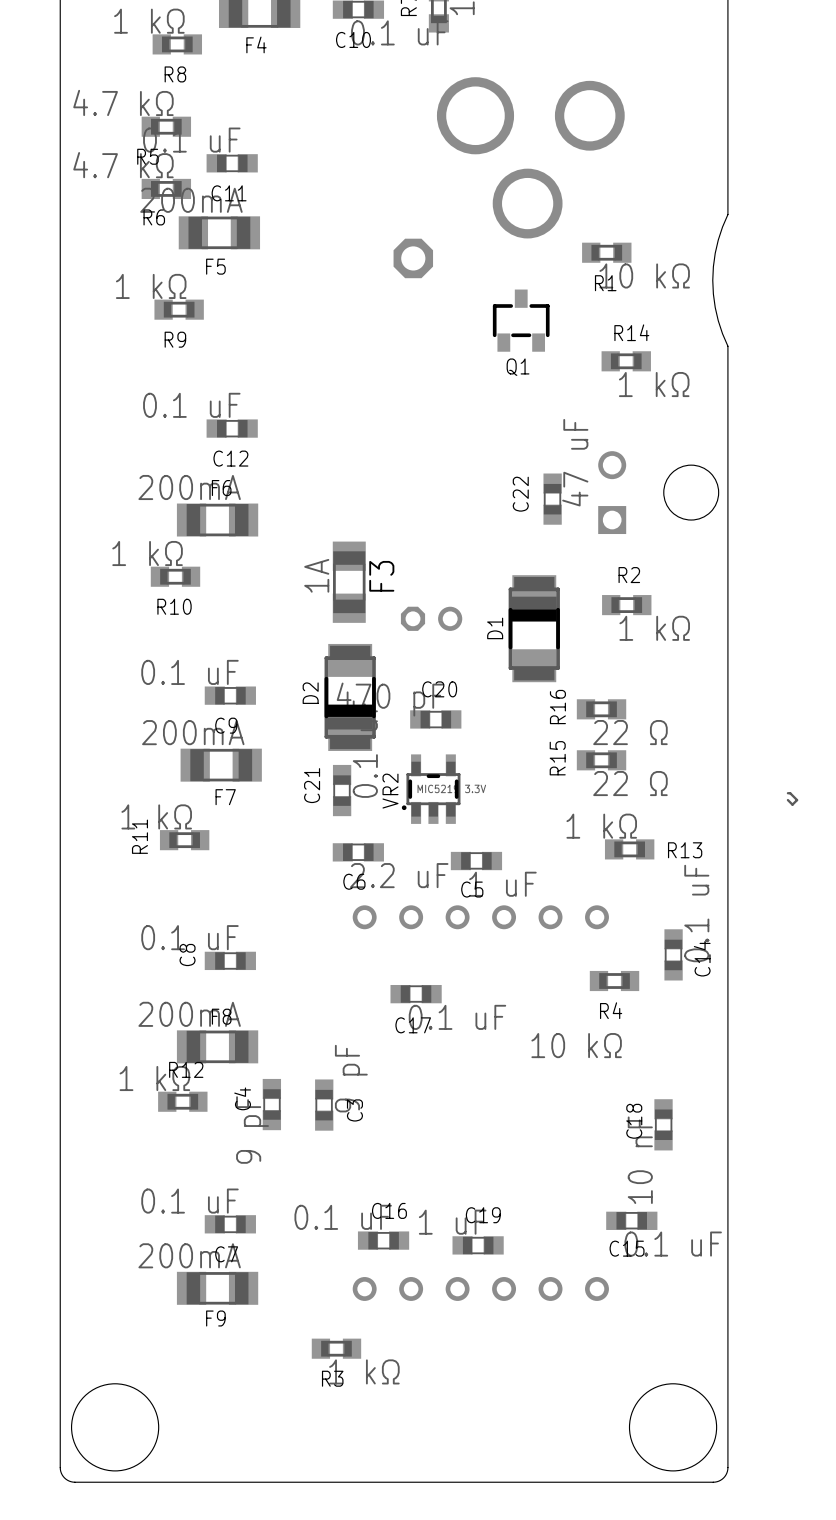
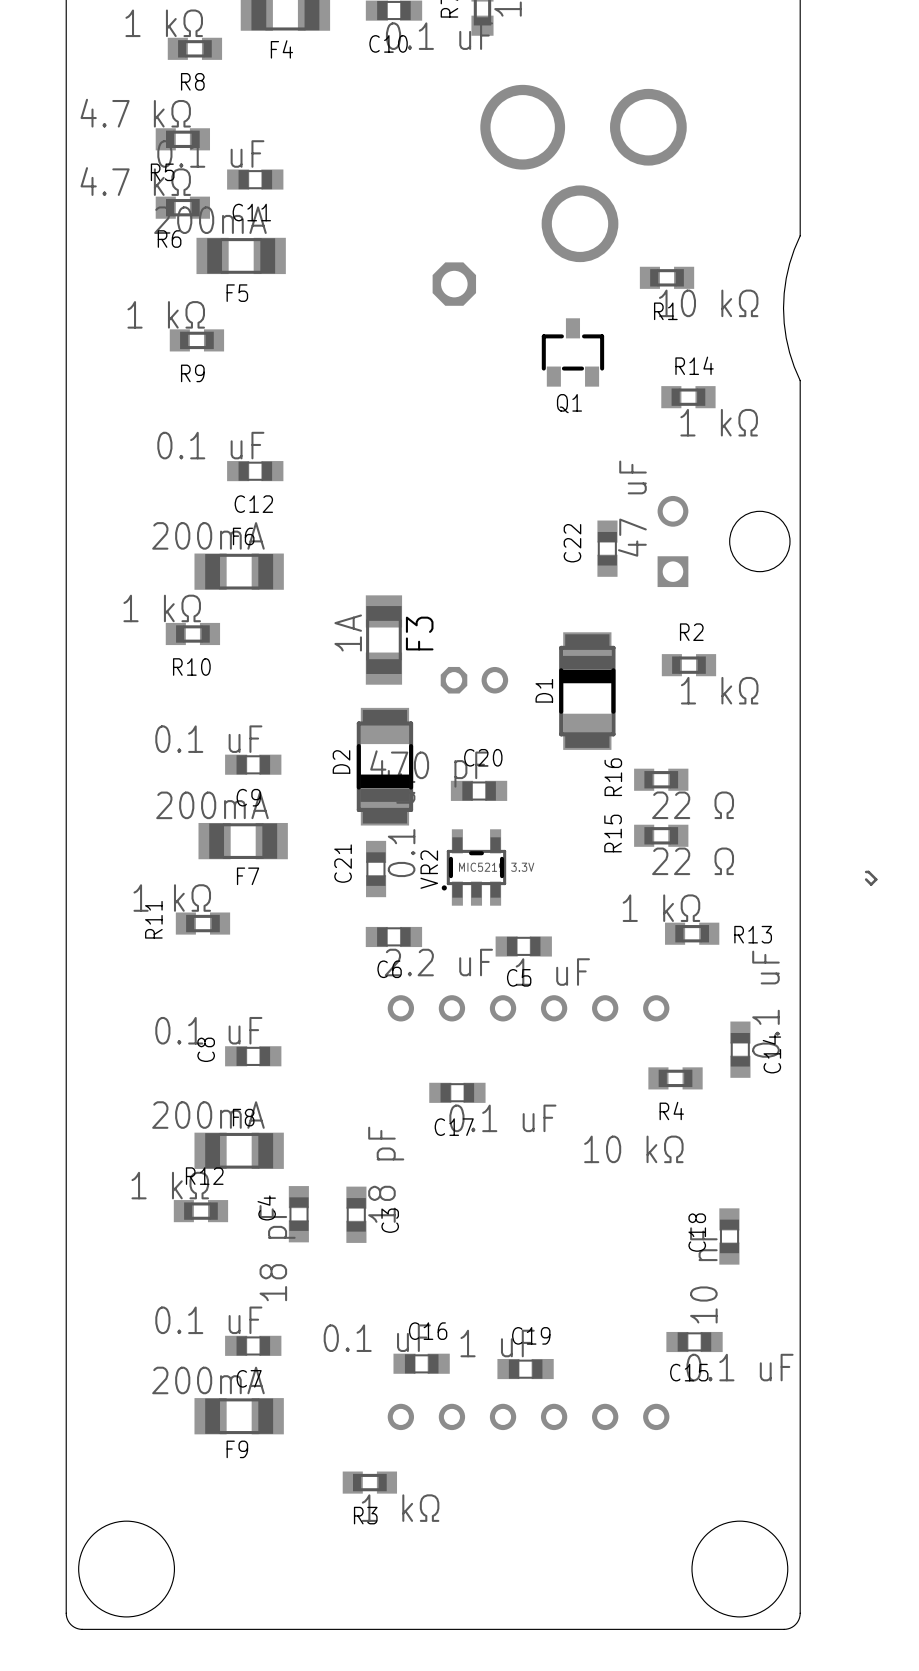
C4 value: 9 pF (351, 1078) -> 18 pF (386, 1174)
C3 value: 9 pF (252, 1130) -> 18 pF (277, 1253)

